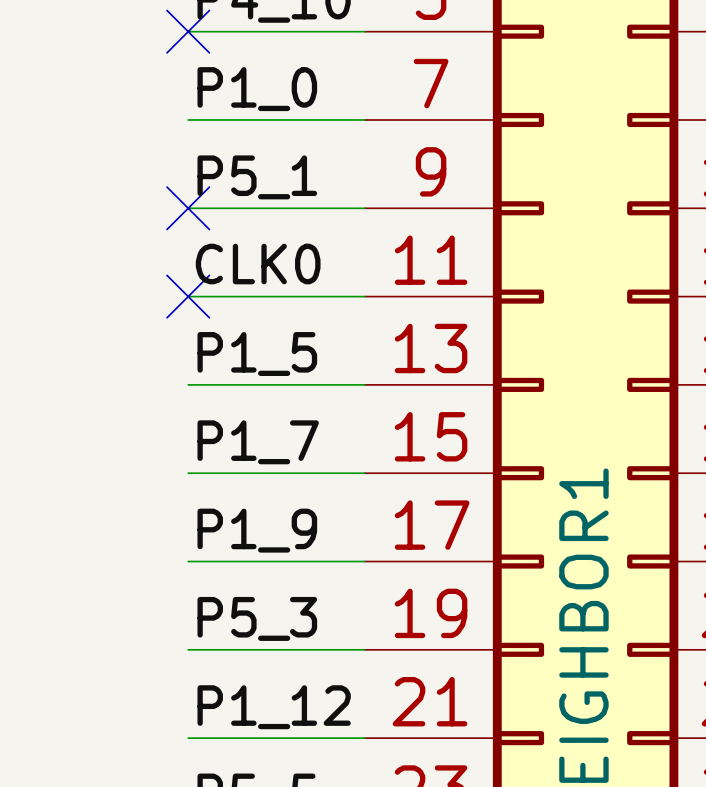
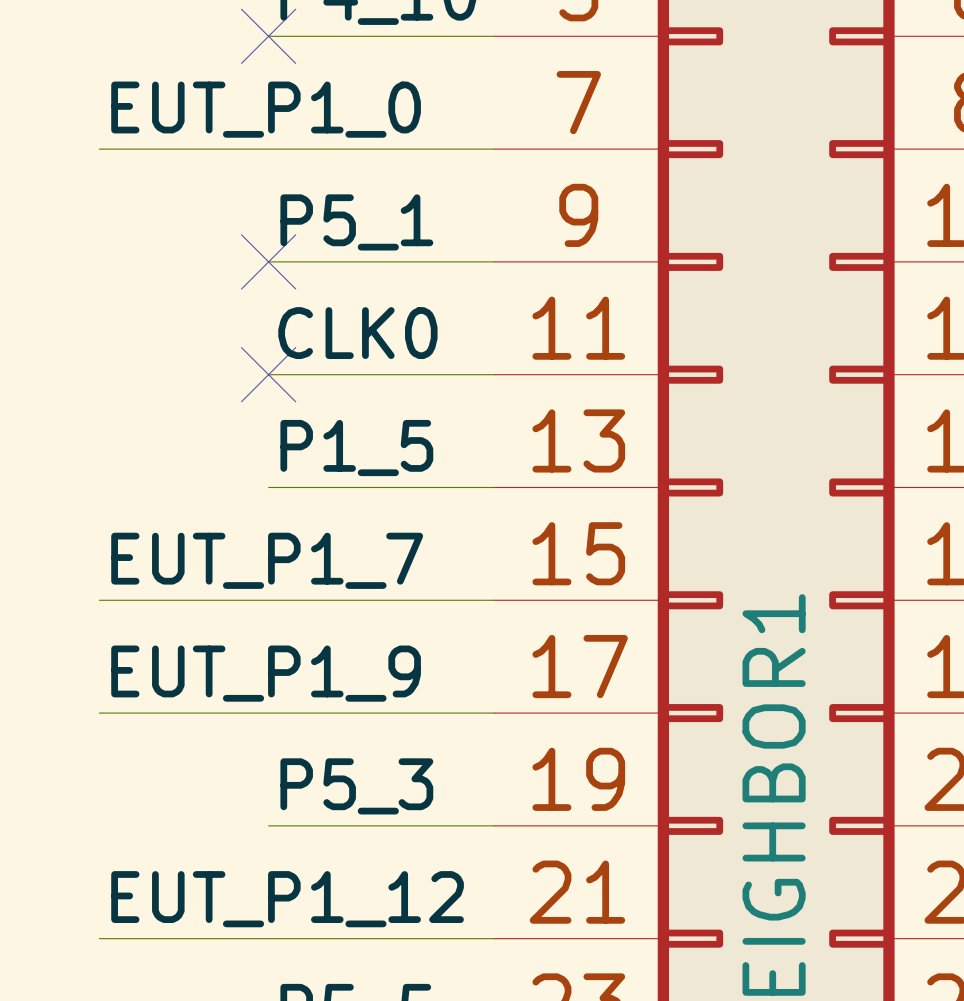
label: P1_0 (257, 89) -> EUT_P1_0 (266, 109)
wire: none -> (99, 149) (268, 149)
label: P1_7 (258, 442) -> EUT_P1_7 (267, 560)
wire: none -> (99, 600) (268, 600)
label: P1_9 (257, 530) -> EUT_P1_9 (266, 673)
wire: none -> (99, 713) (268, 713)
label: P1_12 (274, 707) -> EUT_P1_12 (287, 899)
wire: none -> (99, 938) (268, 938)

